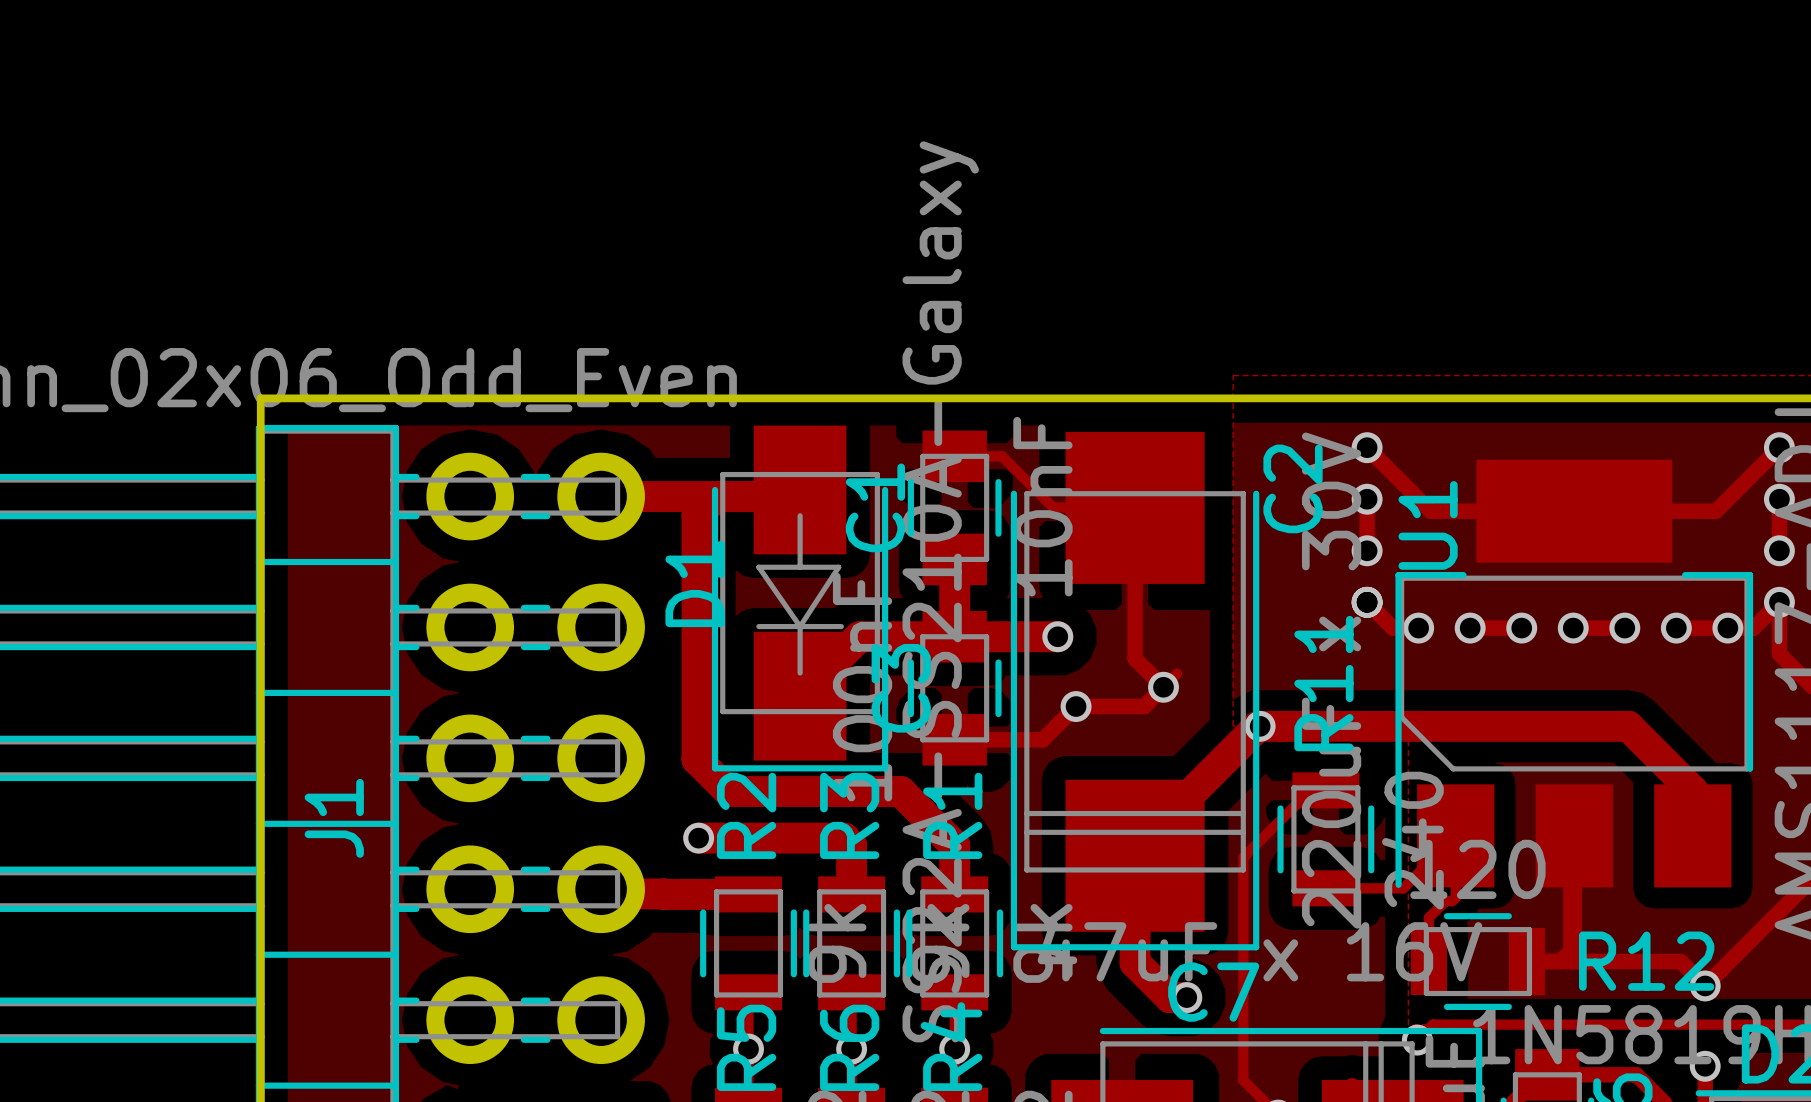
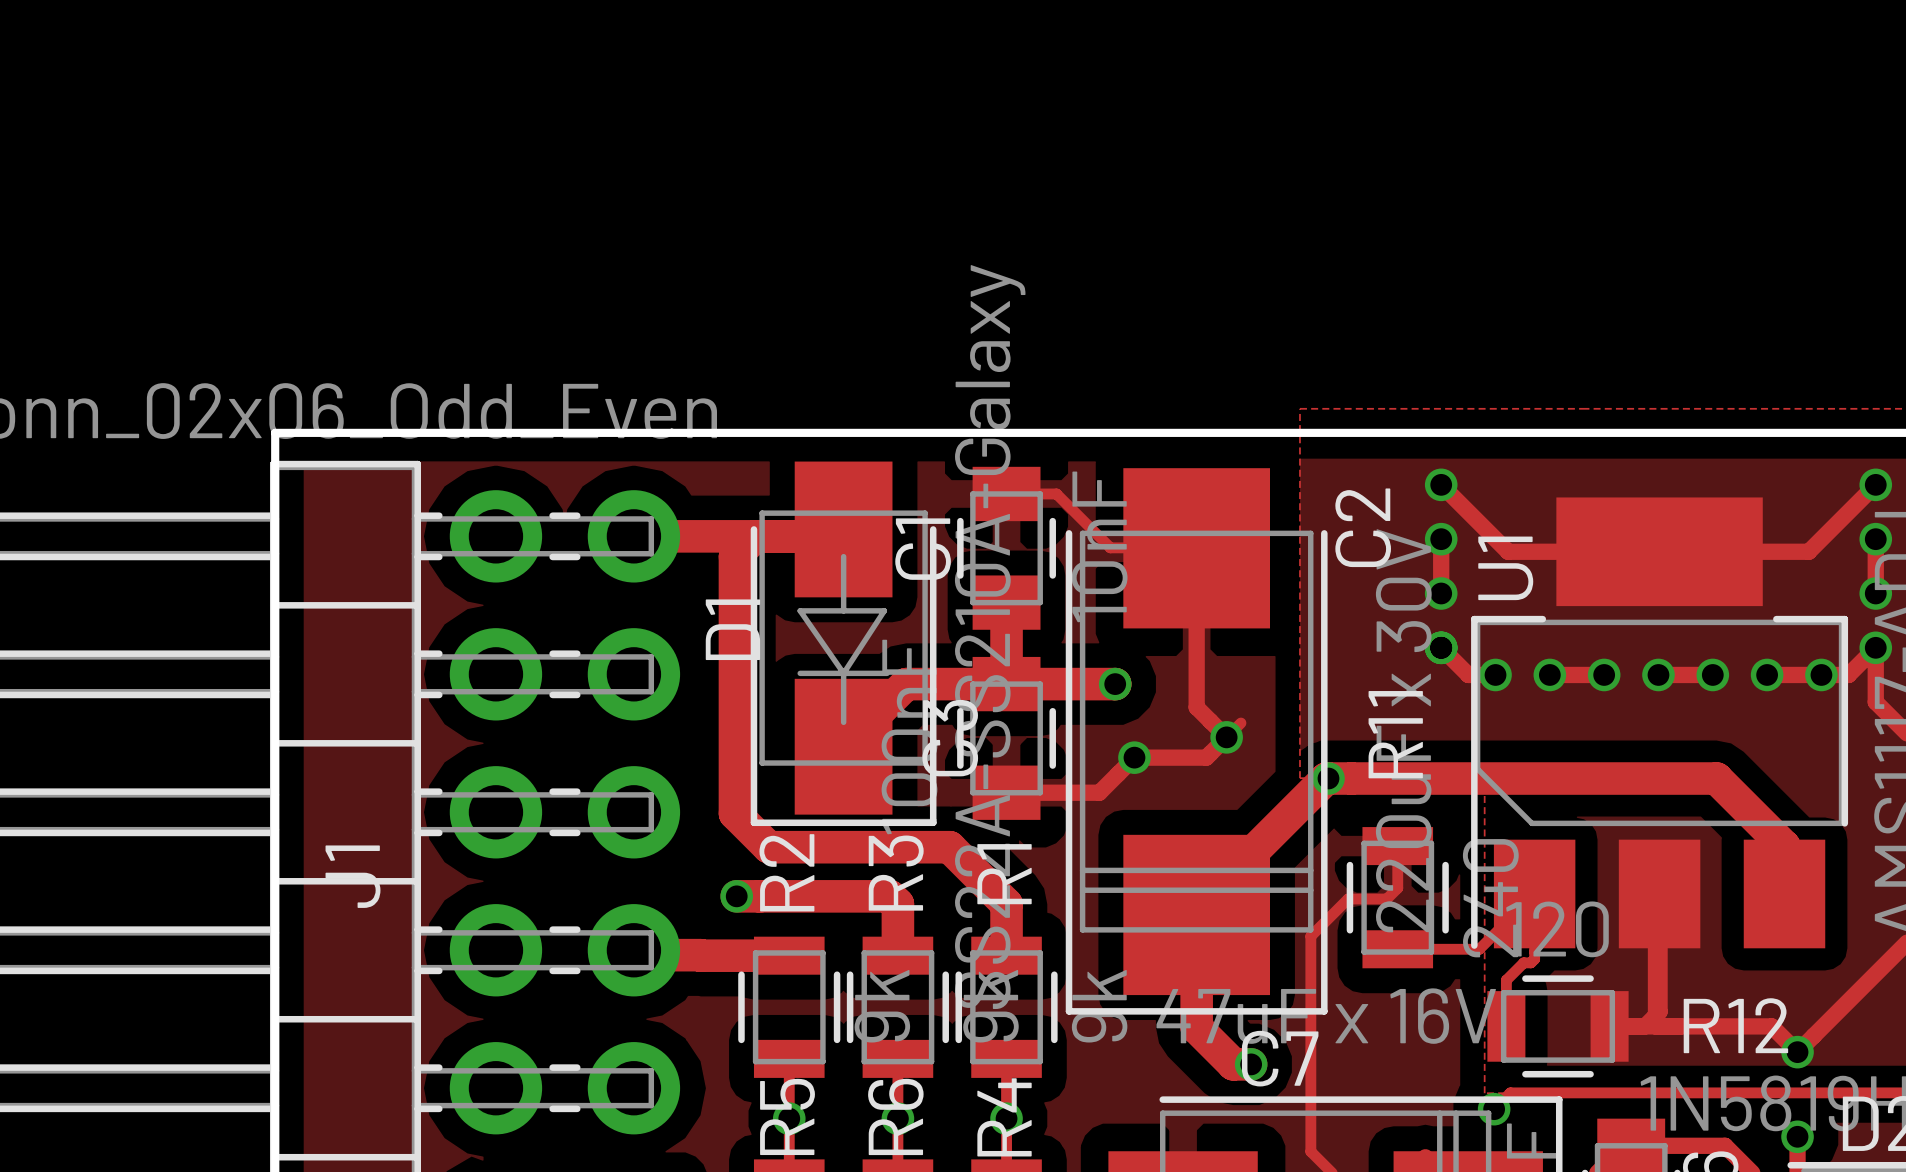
track: (1325, 790) (1310, 790) (1243, 857) (1243, 876) -> (1397, 846) (1397, 888) (1386, 899) (1348, 899) (1310, 936)

